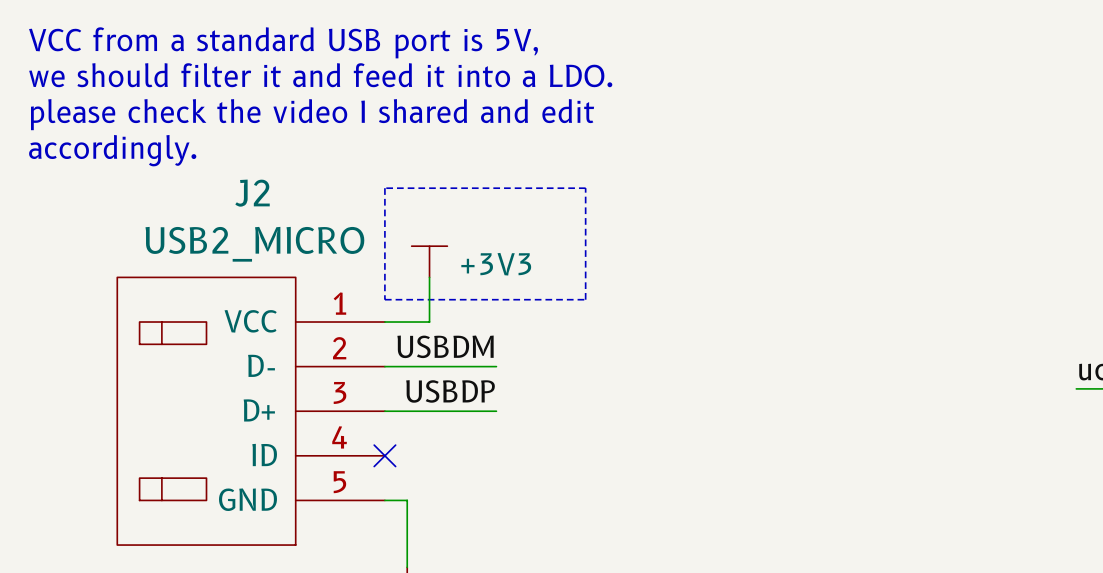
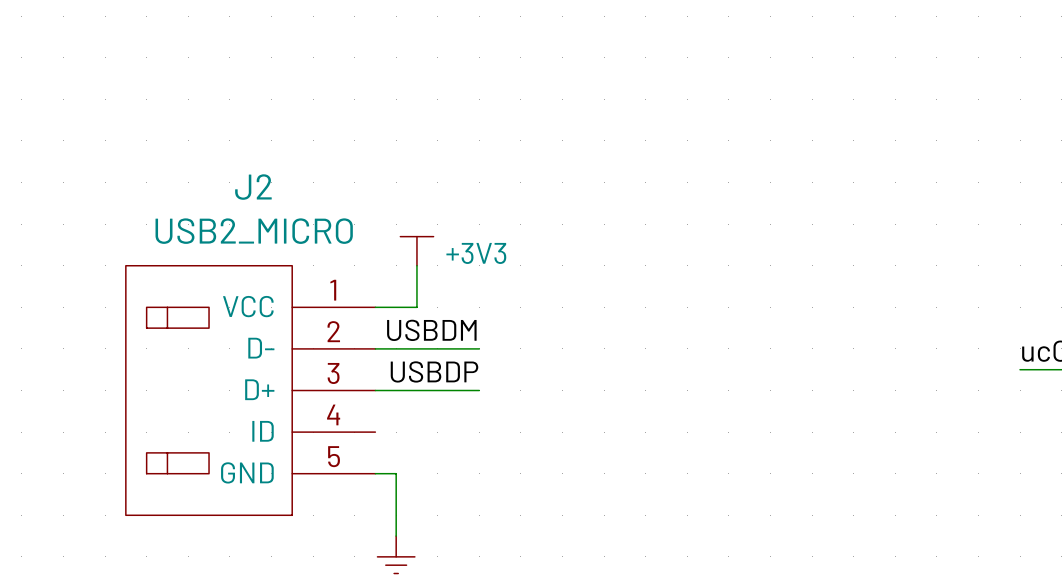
text: VCC from a standard USB port is 5V, (283, 42) -> none
text: we should filter it and feed it into a LDO. (320, 75) -> none
text: please check the video I shared and edit (312, 114) -> none
text: accordingly. (112, 150) -> none
line: (384, 188) (384, 299) (585, 299) (585, 188) (384, 188) -> none
no-connect mark: (384, 455) -> none

